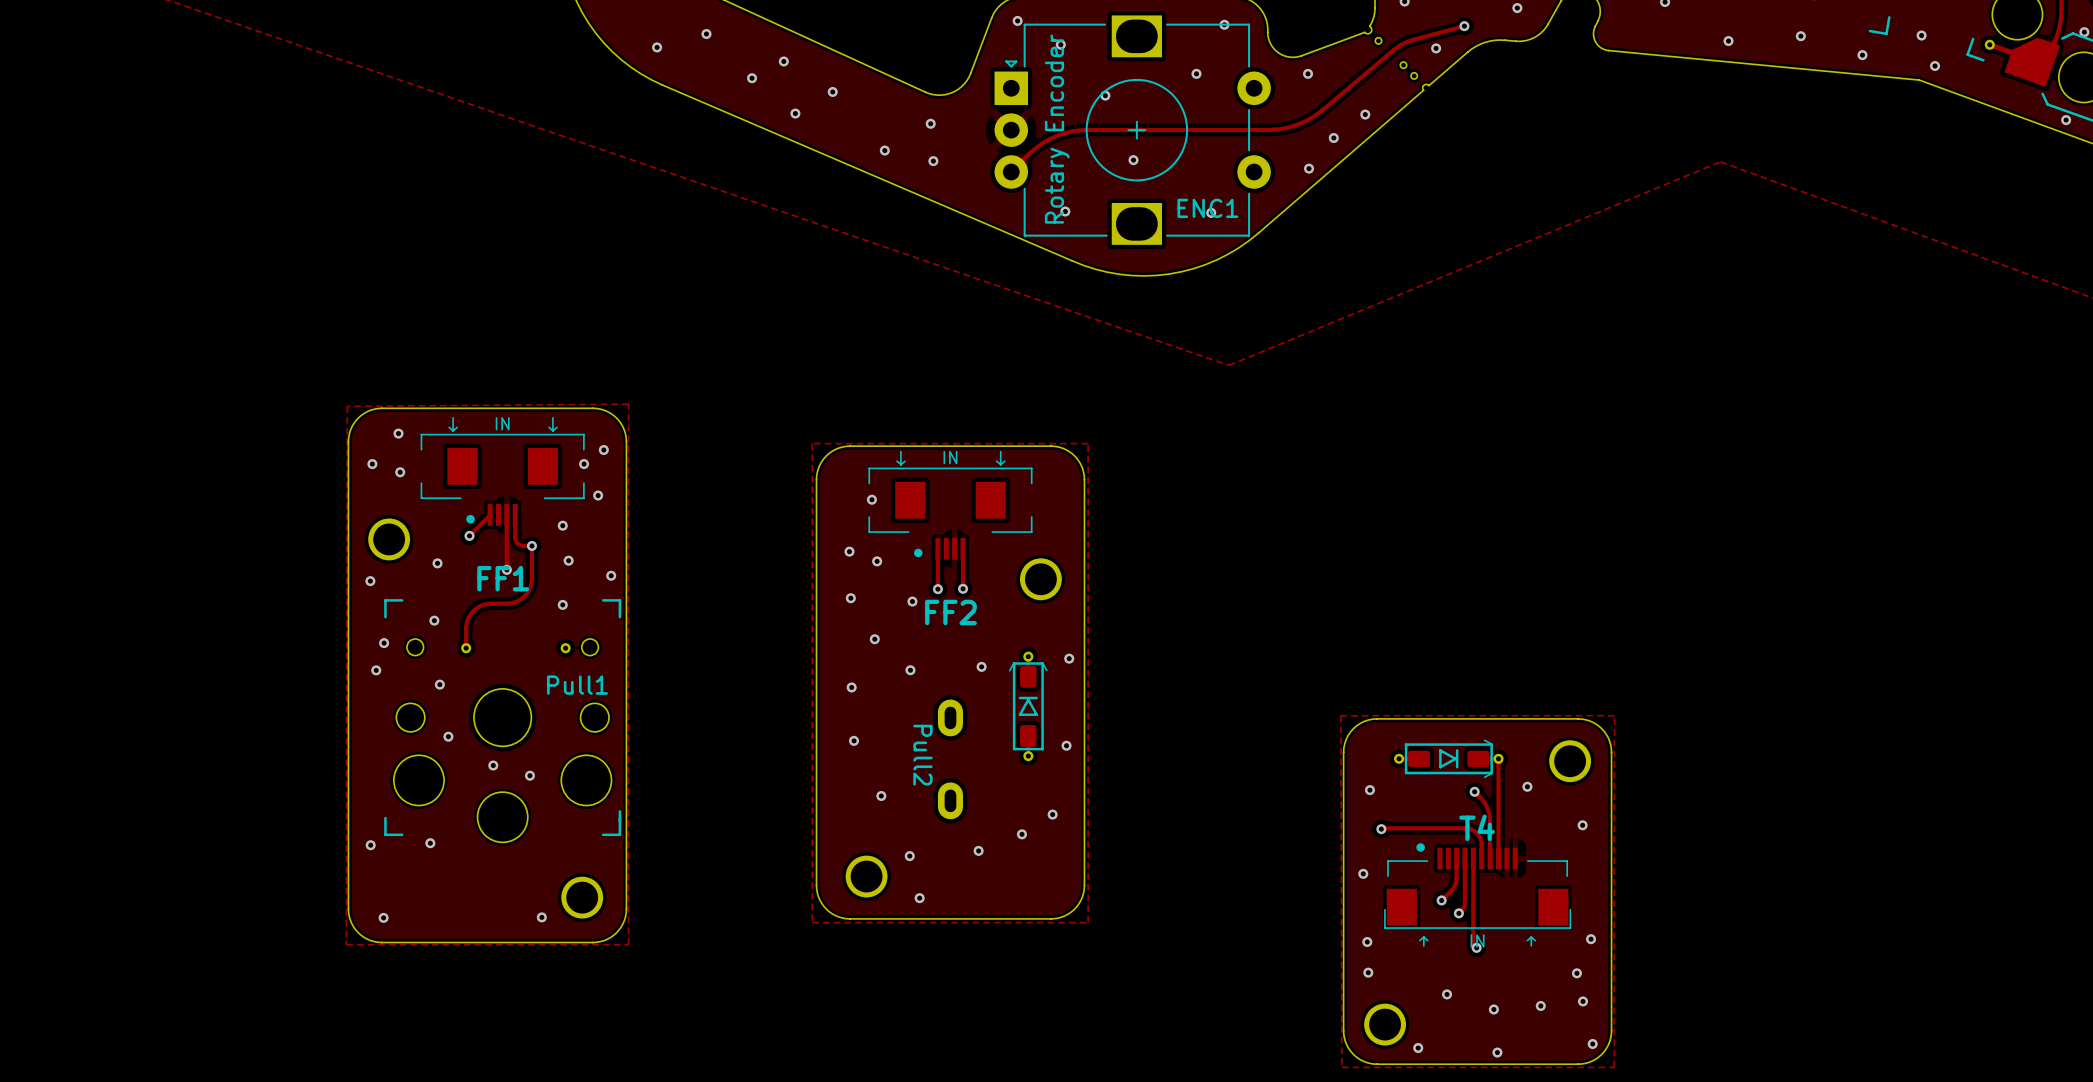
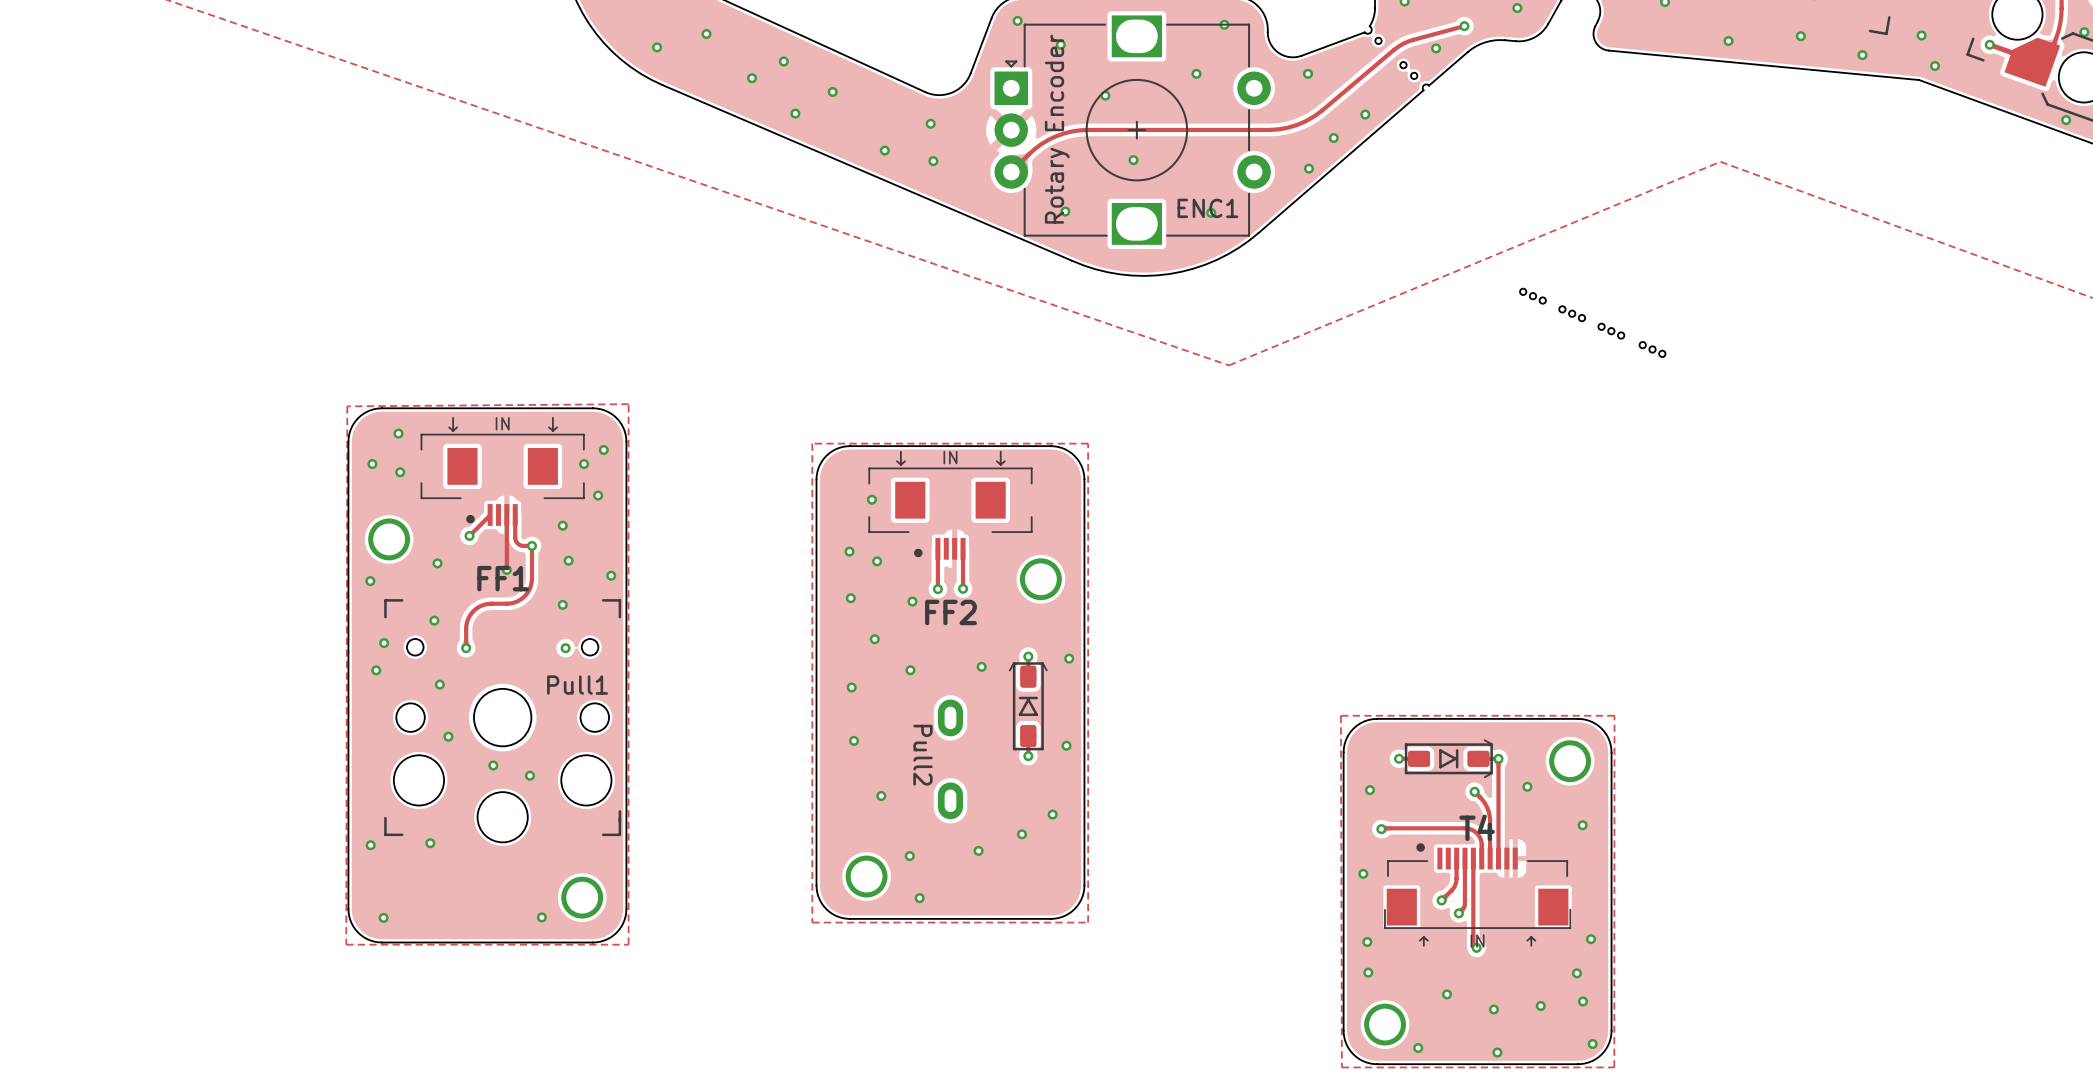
round board edge: none -> [1519, 287, 1528, 296]
round board edge: none -> [1528, 292, 1538, 301]
round board edge: none -> [1538, 296, 1547, 305]
round board edge: none -> [1558, 305, 1567, 314]
round board edge: none -> [1568, 309, 1577, 318]
round board edge: none -> [1577, 314, 1587, 323]
round board edge: none -> [1597, 322, 1606, 331]
round board edge: none -> [1607, 327, 1616, 336]
round board edge: none -> [1617, 331, 1626, 340]
round board edge: none -> [1638, 341, 1647, 350]
round board edge: none -> [1648, 345, 1657, 354]
round board edge: none -> [1658, 349, 1667, 358]

